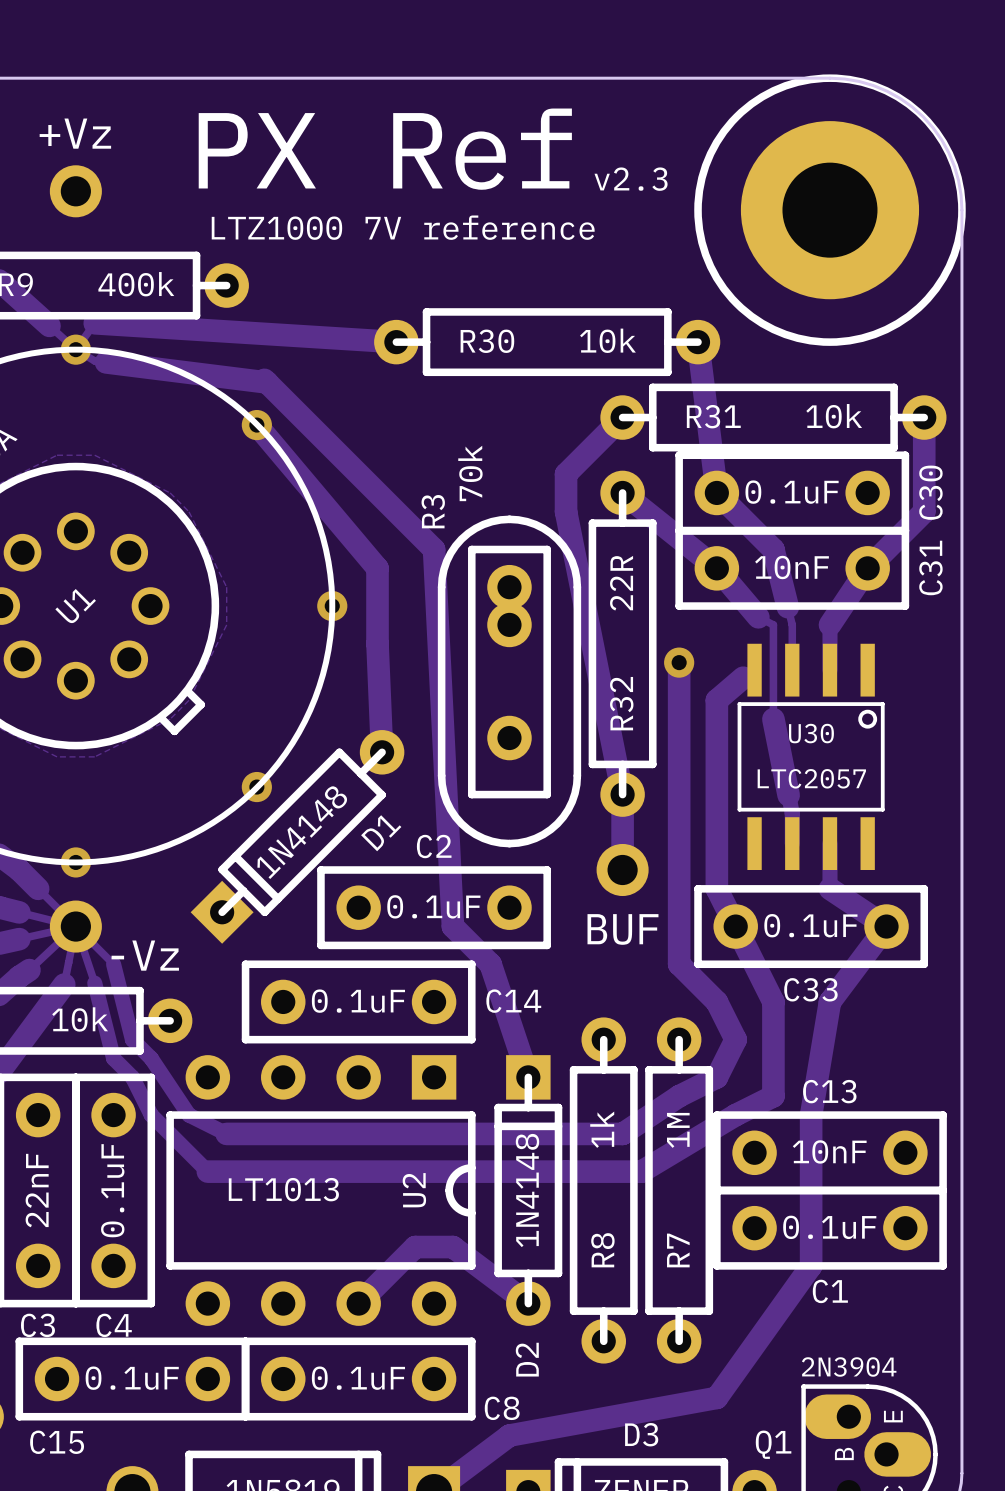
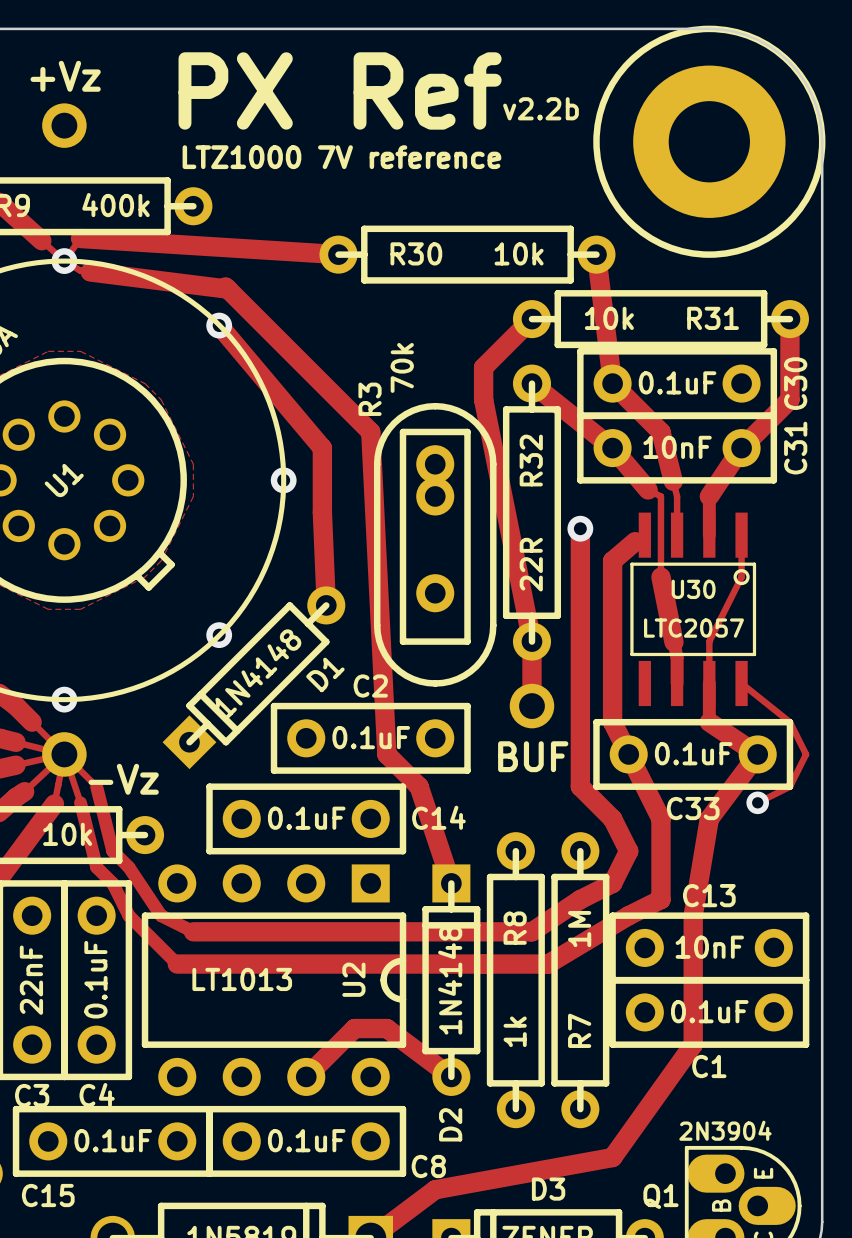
text: v2.3 (631, 179) -> v2.2b (540, 108)
R31 name position: R31 (713, 416) -> R31 (713, 318)
R31 value position: 10k (834, 416) -> 10k (609, 318)
R32 value position: 22R (621, 583) -> 22R (531, 564)
track: none -> (741, 535) (741, 577) (709, 641) (709, 683)
R32 name position: R32 (621, 703) -> R32 (531, 460)
track: none -> (741, 683) (789, 722) (806, 754) (789, 786) (757, 802)
via: none -> (757, 802)
R8 value position: 1k (602, 1129) -> 1k (515, 1031)
R8 name position: R8 (602, 1250) -> R8 (515, 928)

